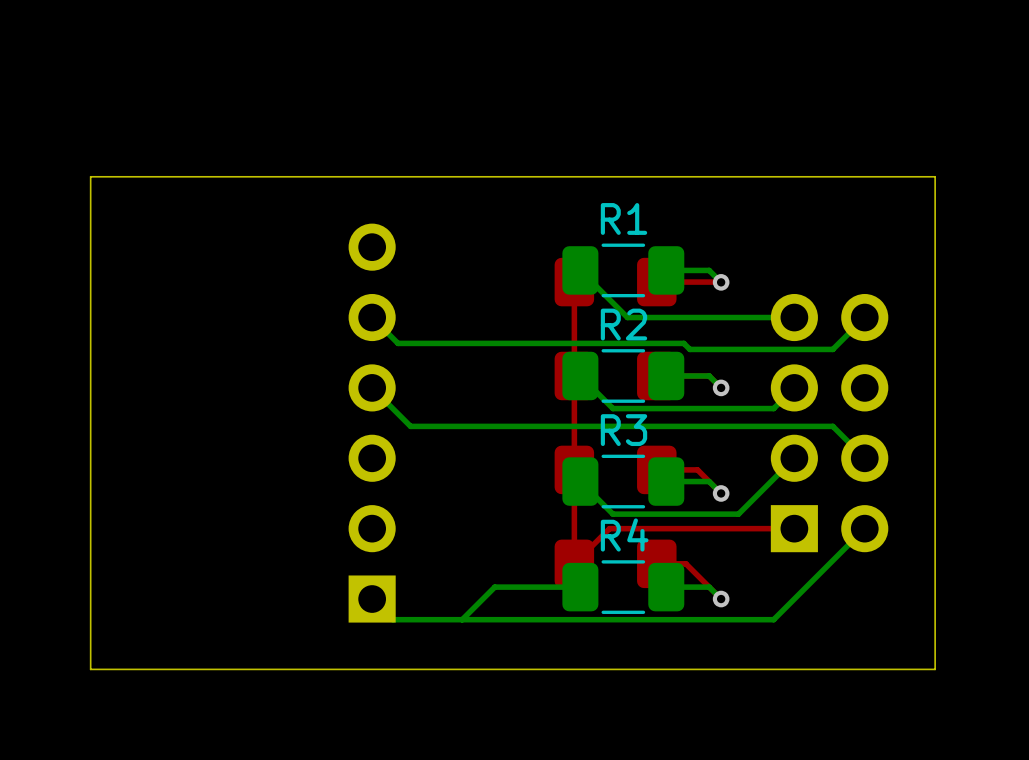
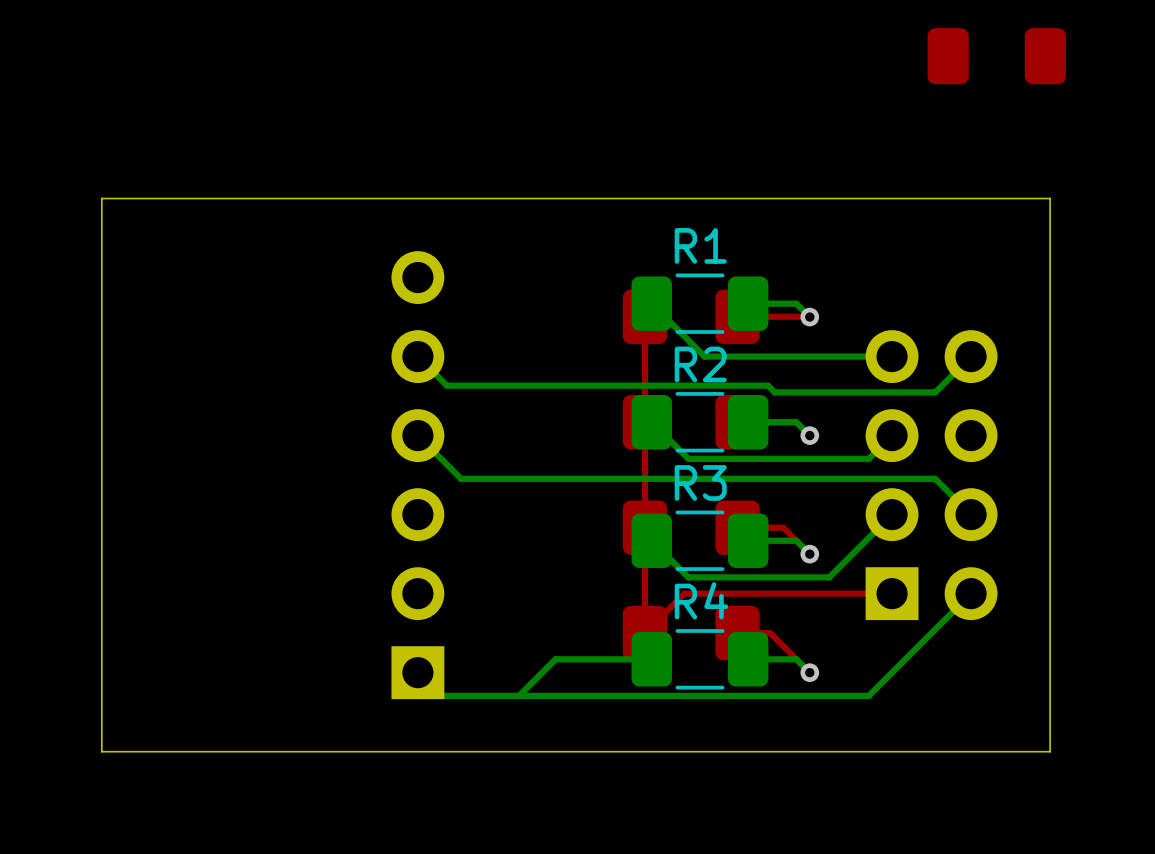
part: none -> (996, 56)

